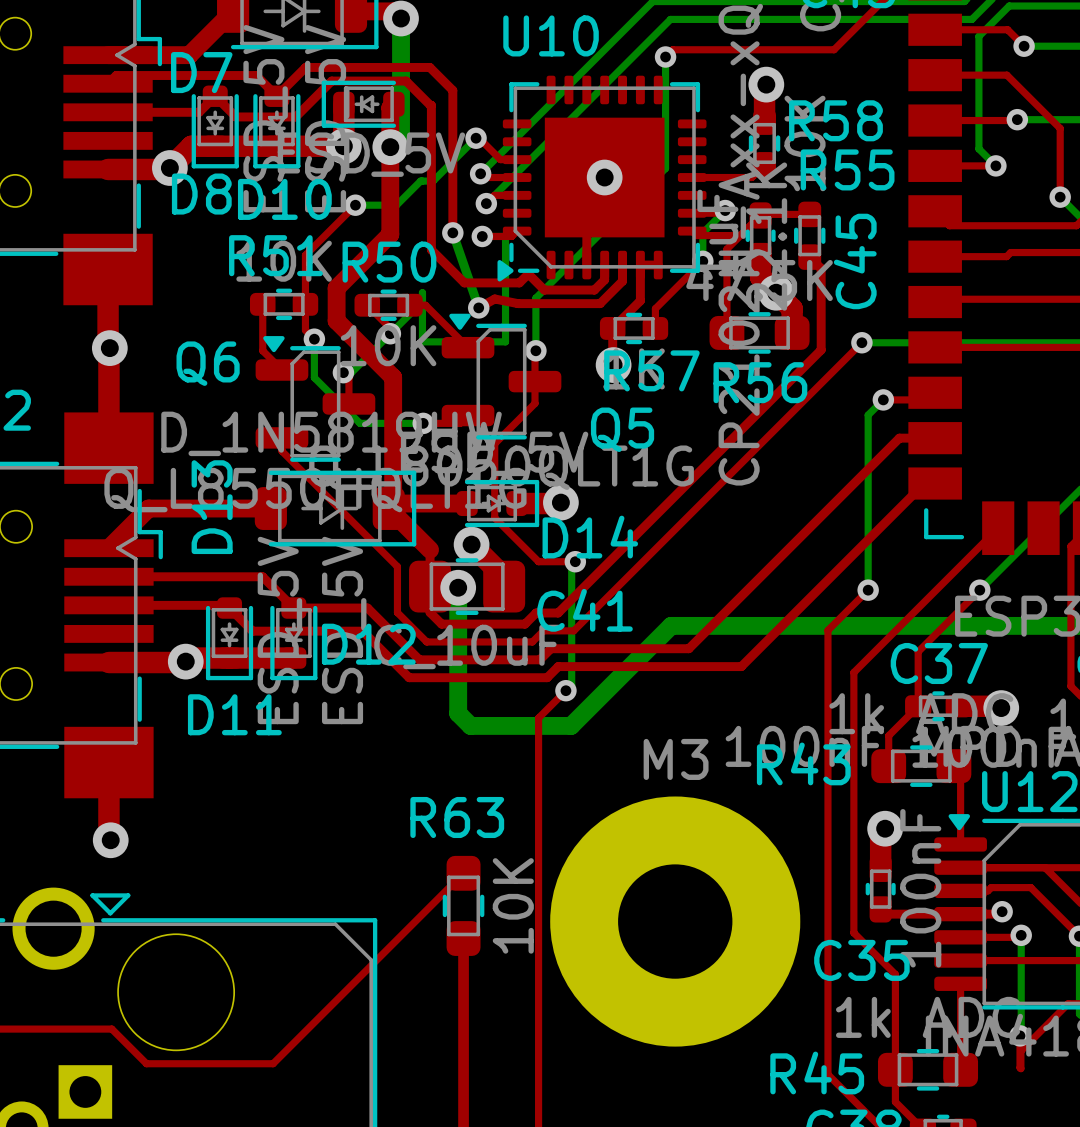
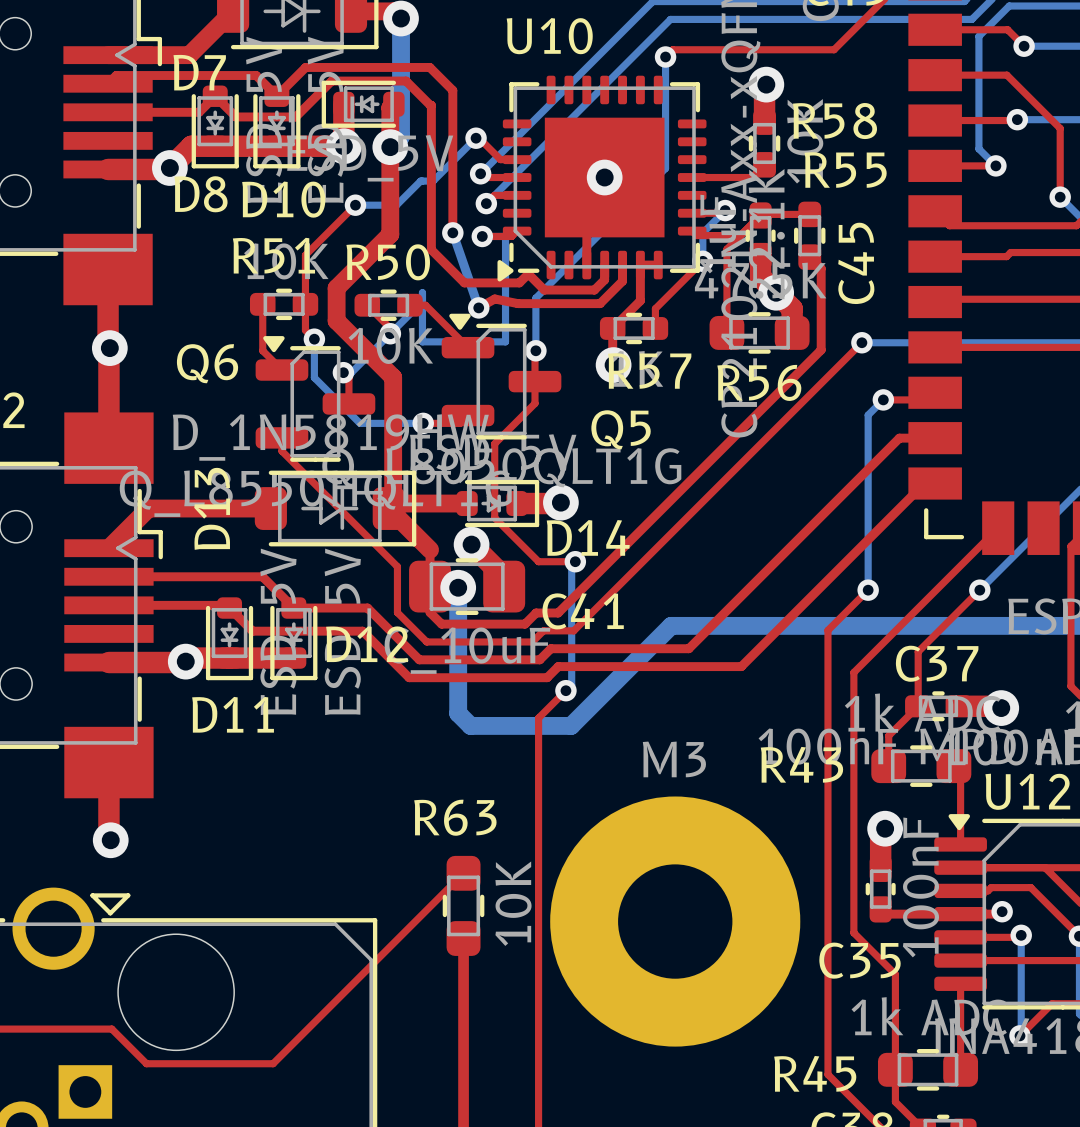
top track: (1068, 1003) (1020, 1051) (1020, 1068) (1020, 1035) -> (1068, 1003) (1052, 1003) (1020, 1035)

